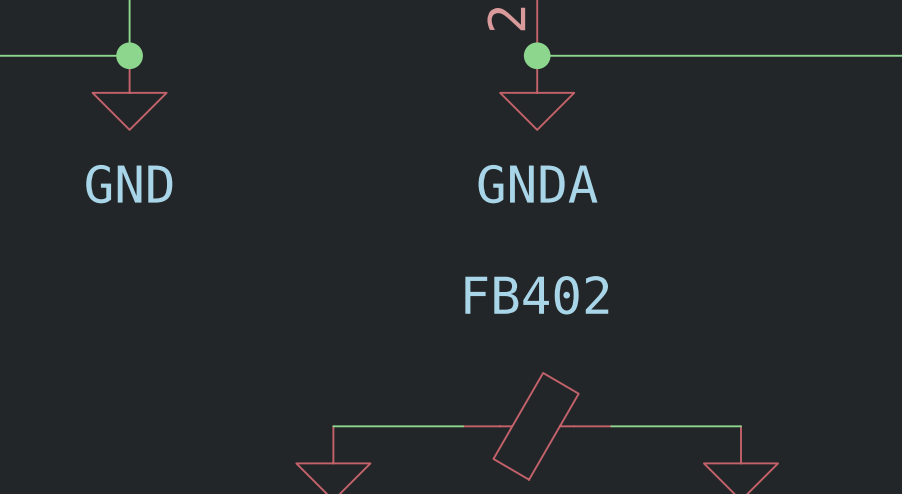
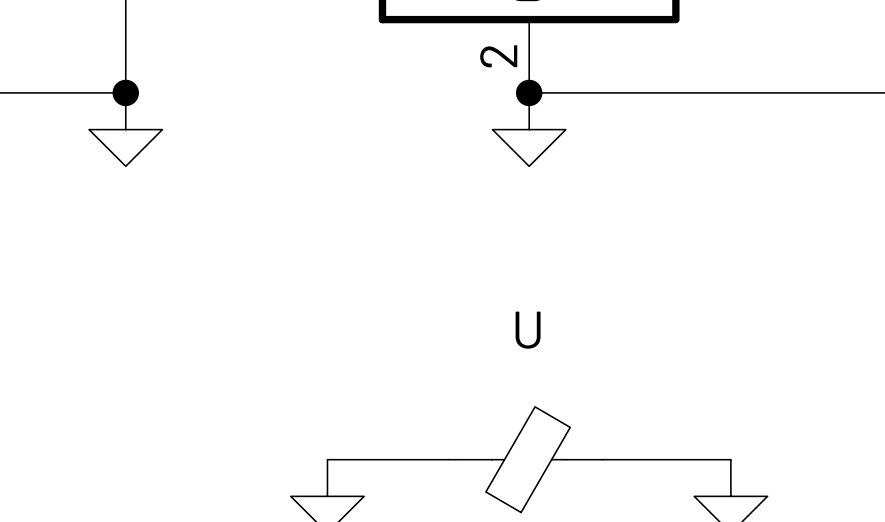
power symbol text: GND (129, 184) -> none
power symbol text: GNDA (538, 184) -> none
FB402 name: FB402 (536, 295) -> U (528, 330)

